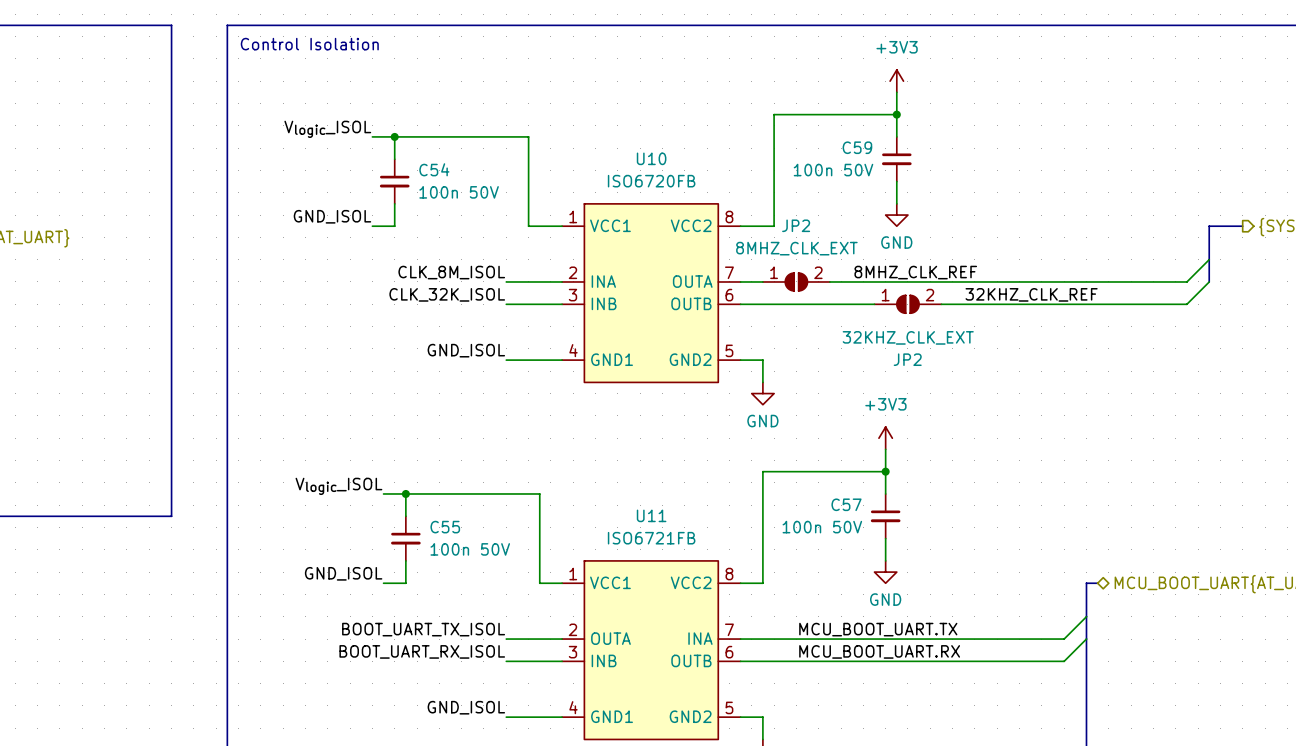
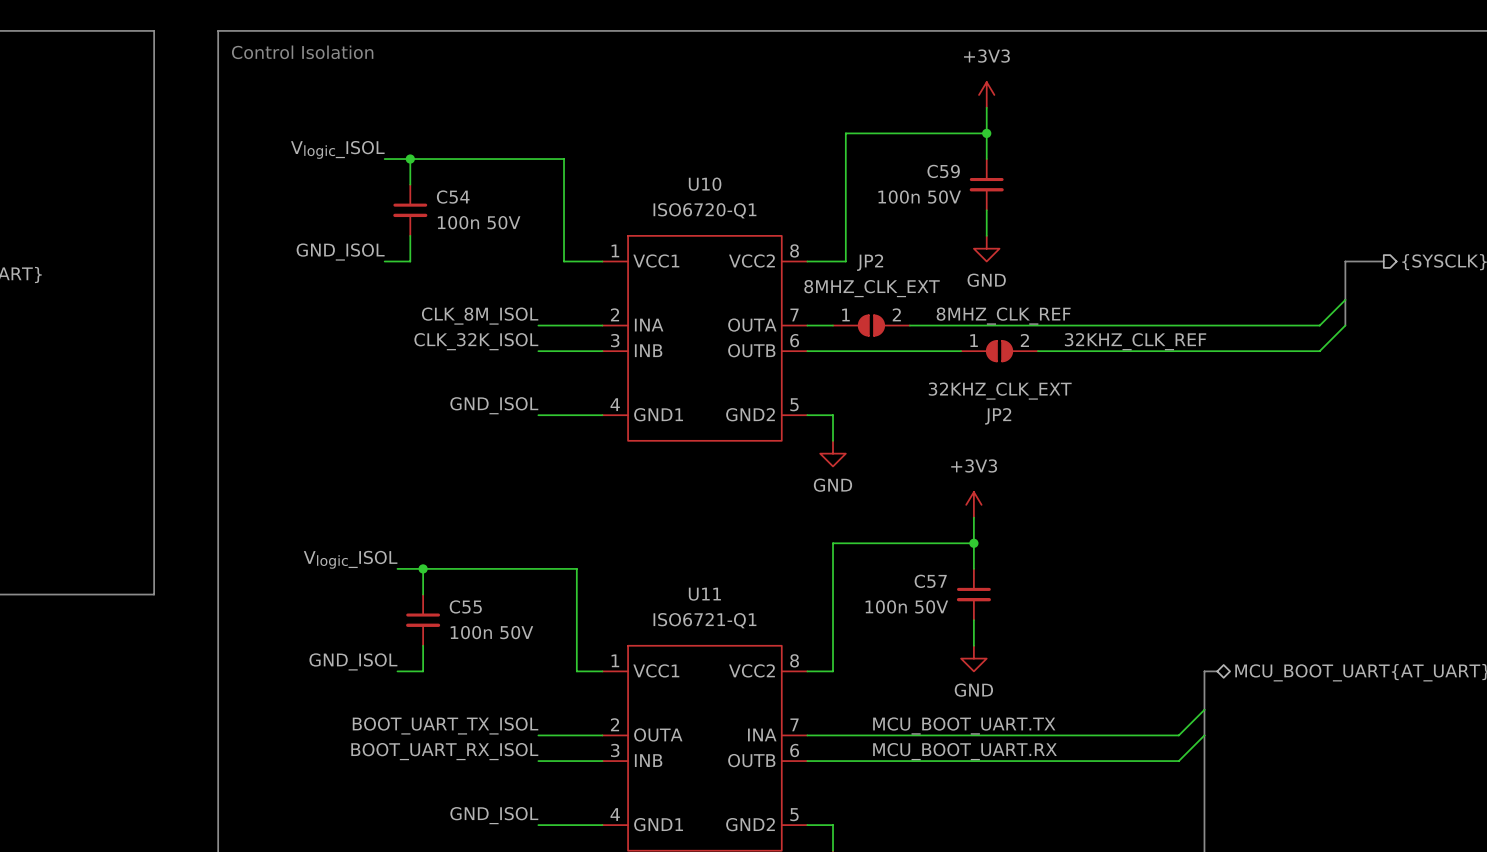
U10 value: ISO6720FB (651, 181) -> ISO6720-Q1 (704, 210)
U11 value: ISO6721FB (651, 538) -> ISO6721-Q1 (704, 620)

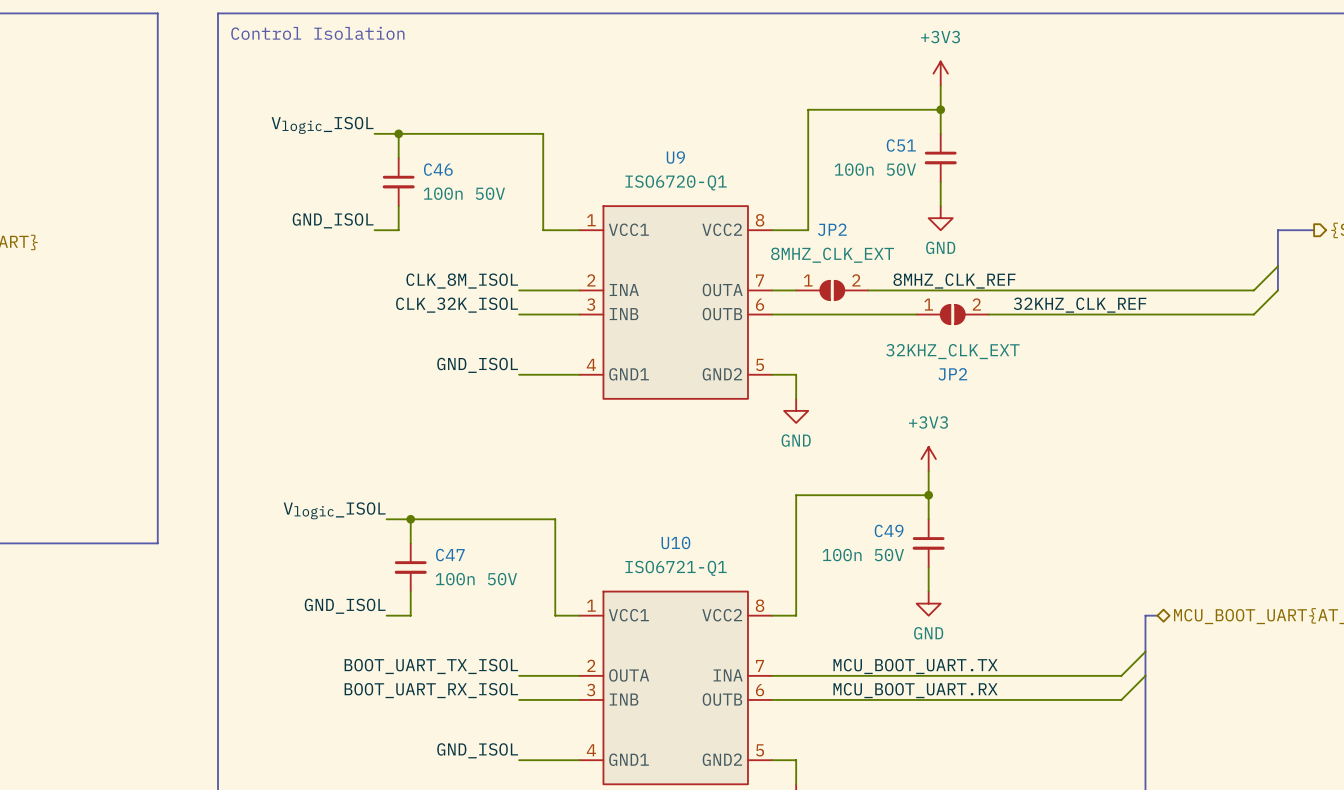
C59 name: C59 (943, 171) -> C51 (901, 145)
U10 name: U10 (705, 184) -> U9 (675, 157)
C54 name: C54 (453, 197) -> C46 (438, 169)
C57 name: C57 (930, 581) -> C49 (889, 530)
U11 name: U11 (704, 594) -> U10 (675, 542)
C55 name: C55 (465, 606) -> C47 (450, 555)

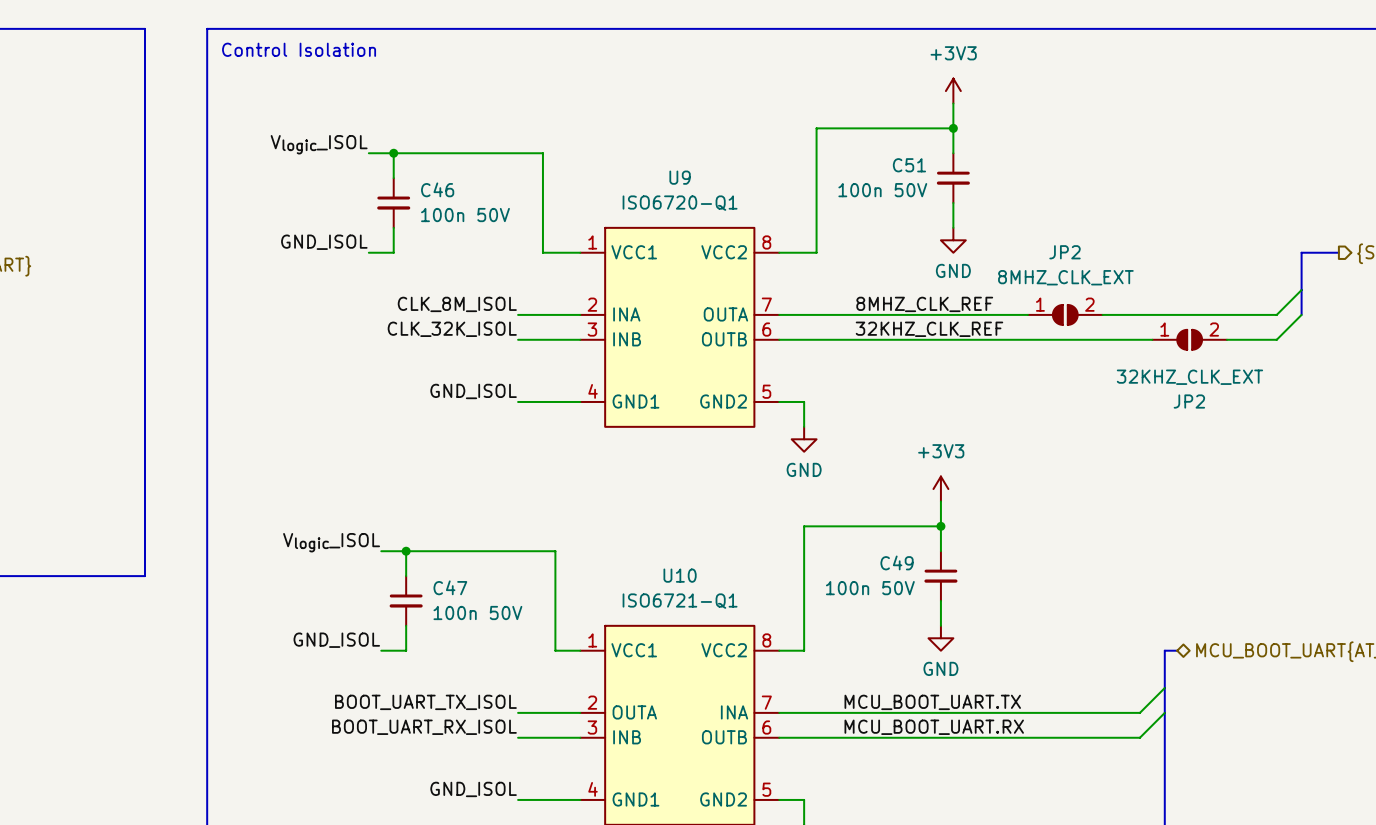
label position: 8MHZ_CLK_REF (954, 281) -> 8MHZ_CLK_REF (924, 304)
JP2 position: (832, 290) -> (1065, 314)
label position: 32KHZ_CLK_REF (1080, 305) -> 32KHZ_CLK_REF (929, 329)
JP2 position: (952, 314) -> (1189, 339)

